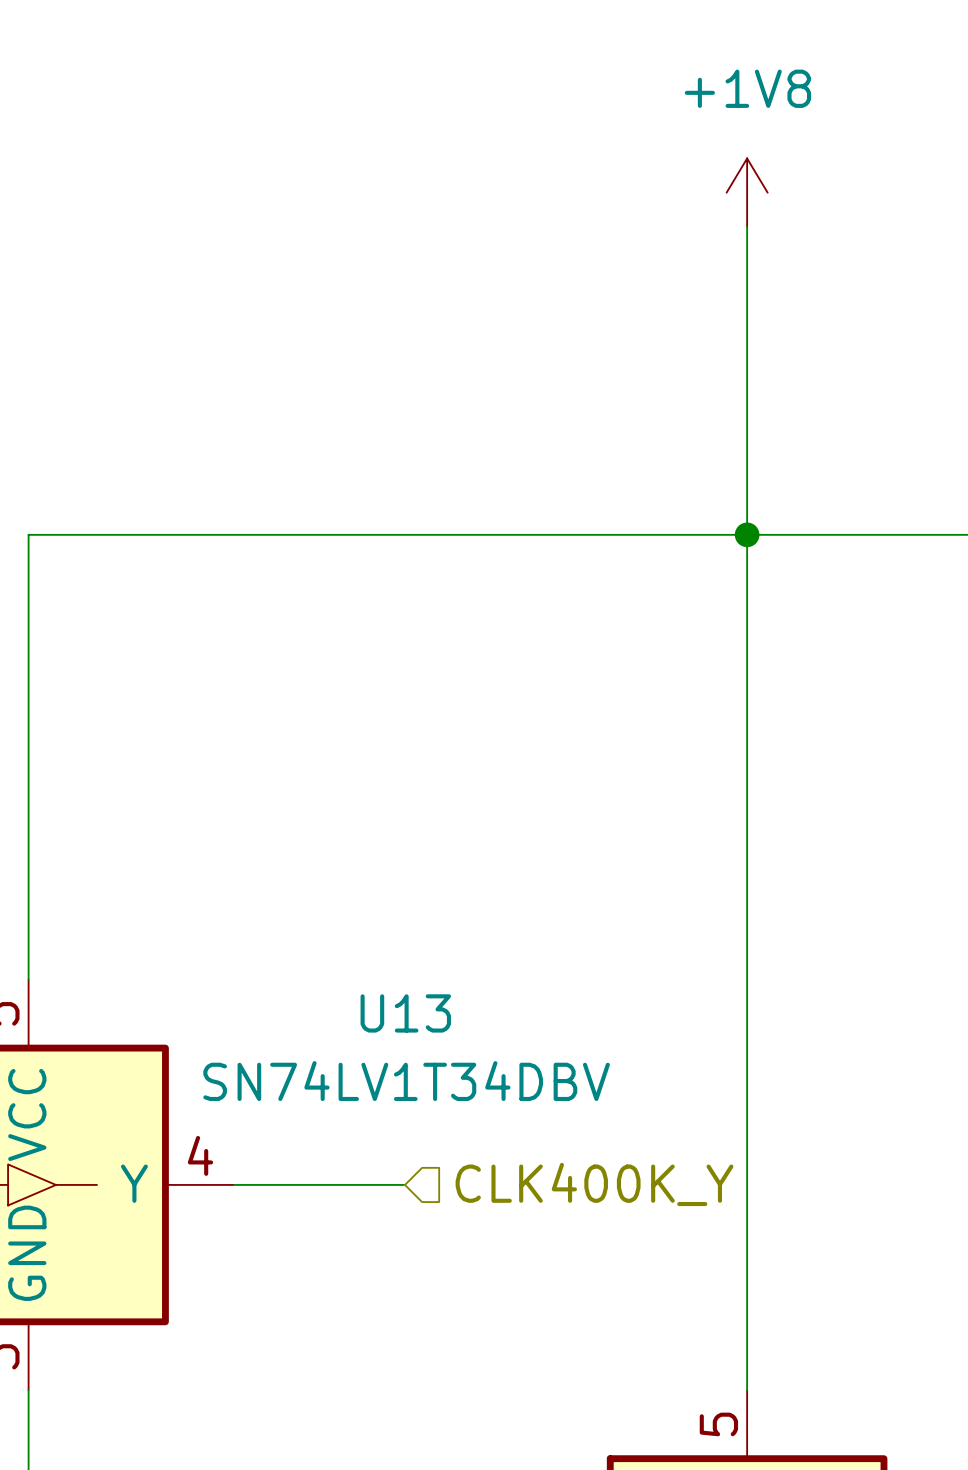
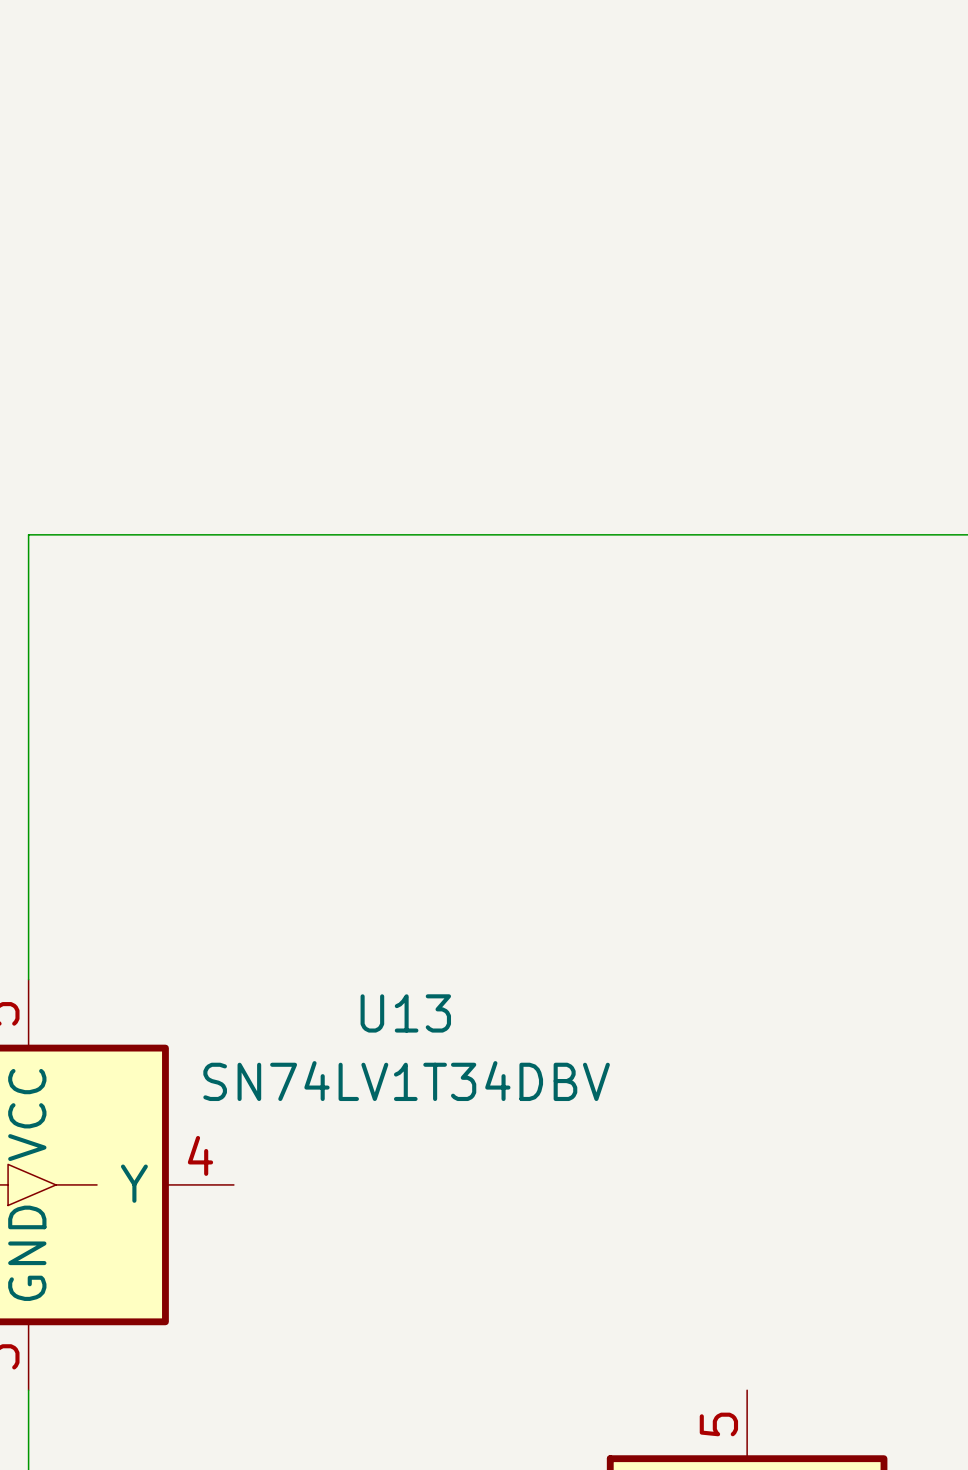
power symbol: +1V8 (747, 192) -> none
wire: (747, 226) (747, 1390) -> none
junction: (747, 534) -> none
wire: (233, 1184) (404, 1184) -> none
hierarchical label: CLK400K_Y (594, 1184) -> none

